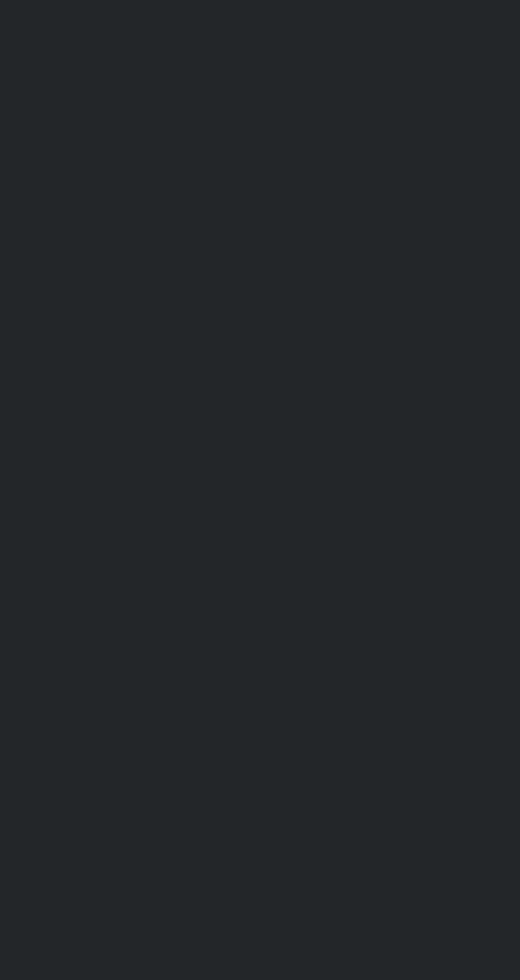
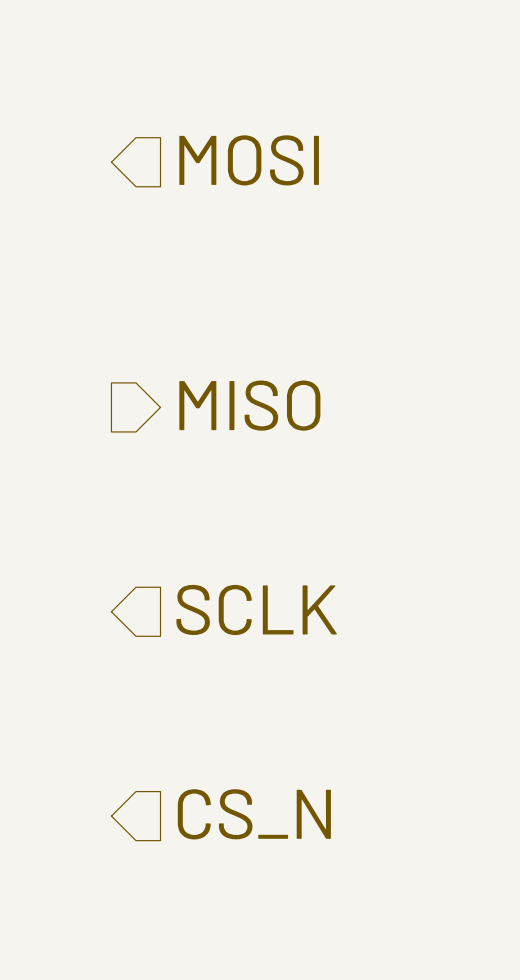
hierarchical label: none -> MOSI (249, 160)
hierarchical label: none -> MISO (249, 405)
hierarchical label: none -> SCLK (256, 609)
hierarchical label: none -> CS_N (254, 814)

